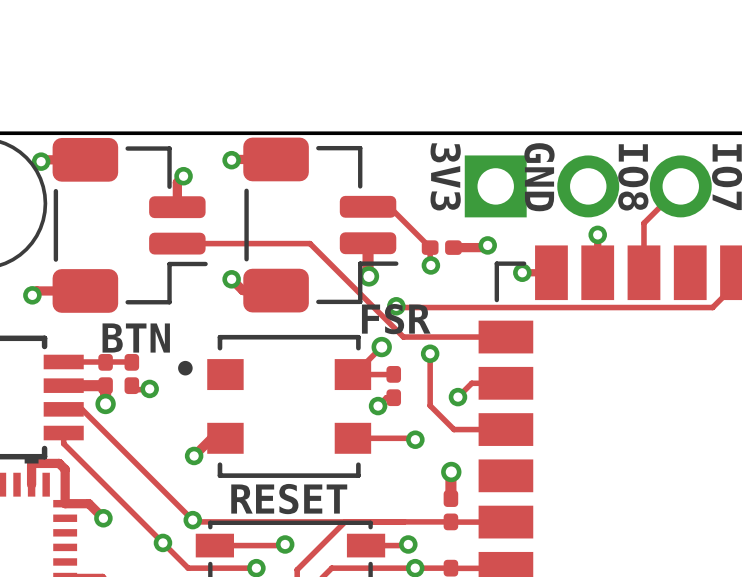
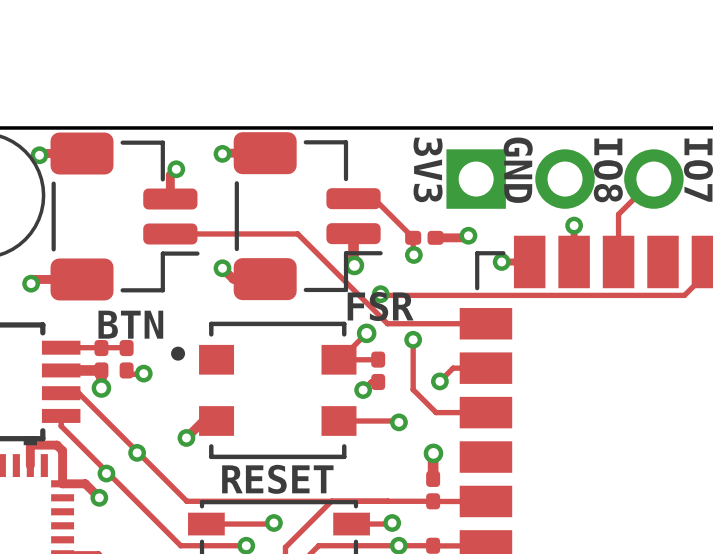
via: none -> (137, 452)
via: none -> (106, 473)
via: (192, 520) -> none
via: (162, 542) -> none

